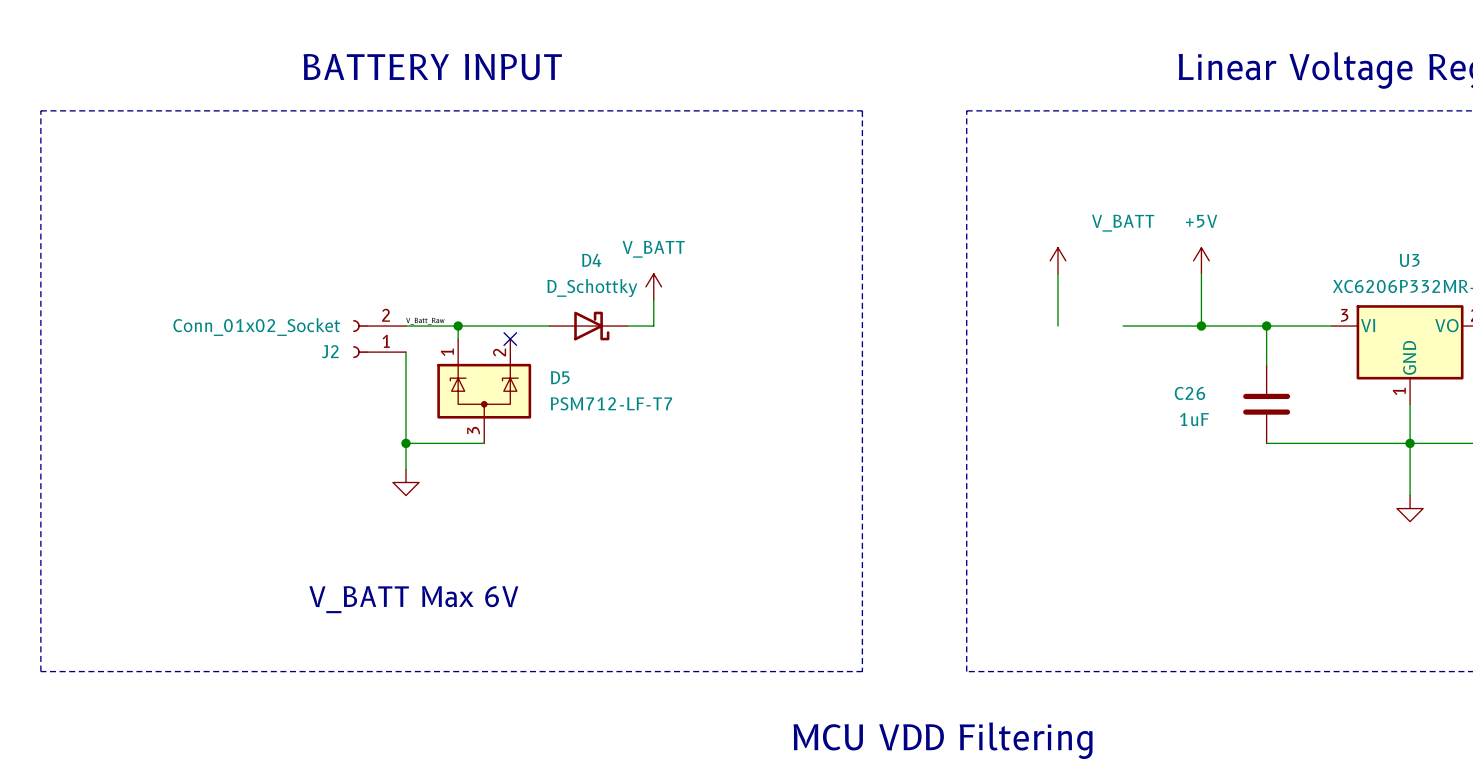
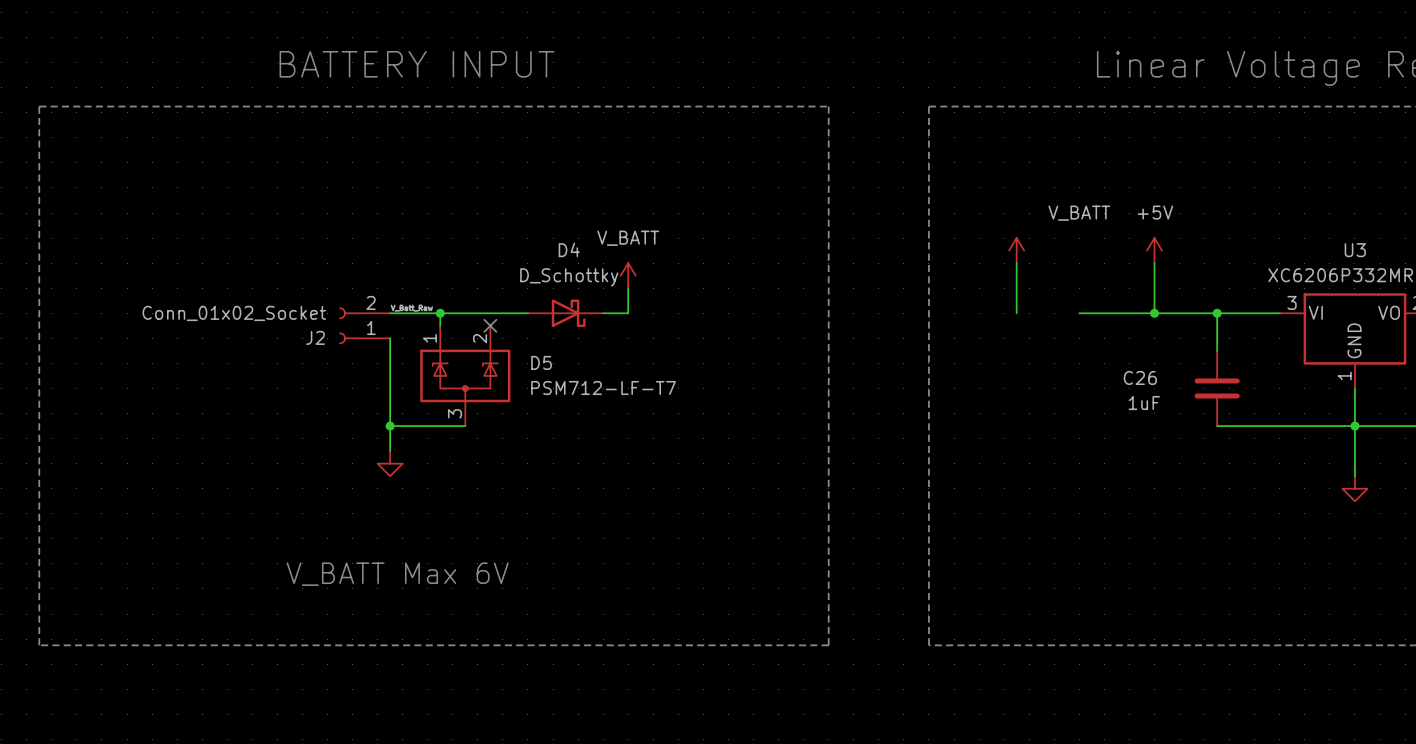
text: MCU VDD Filtering (943, 740) -> none

